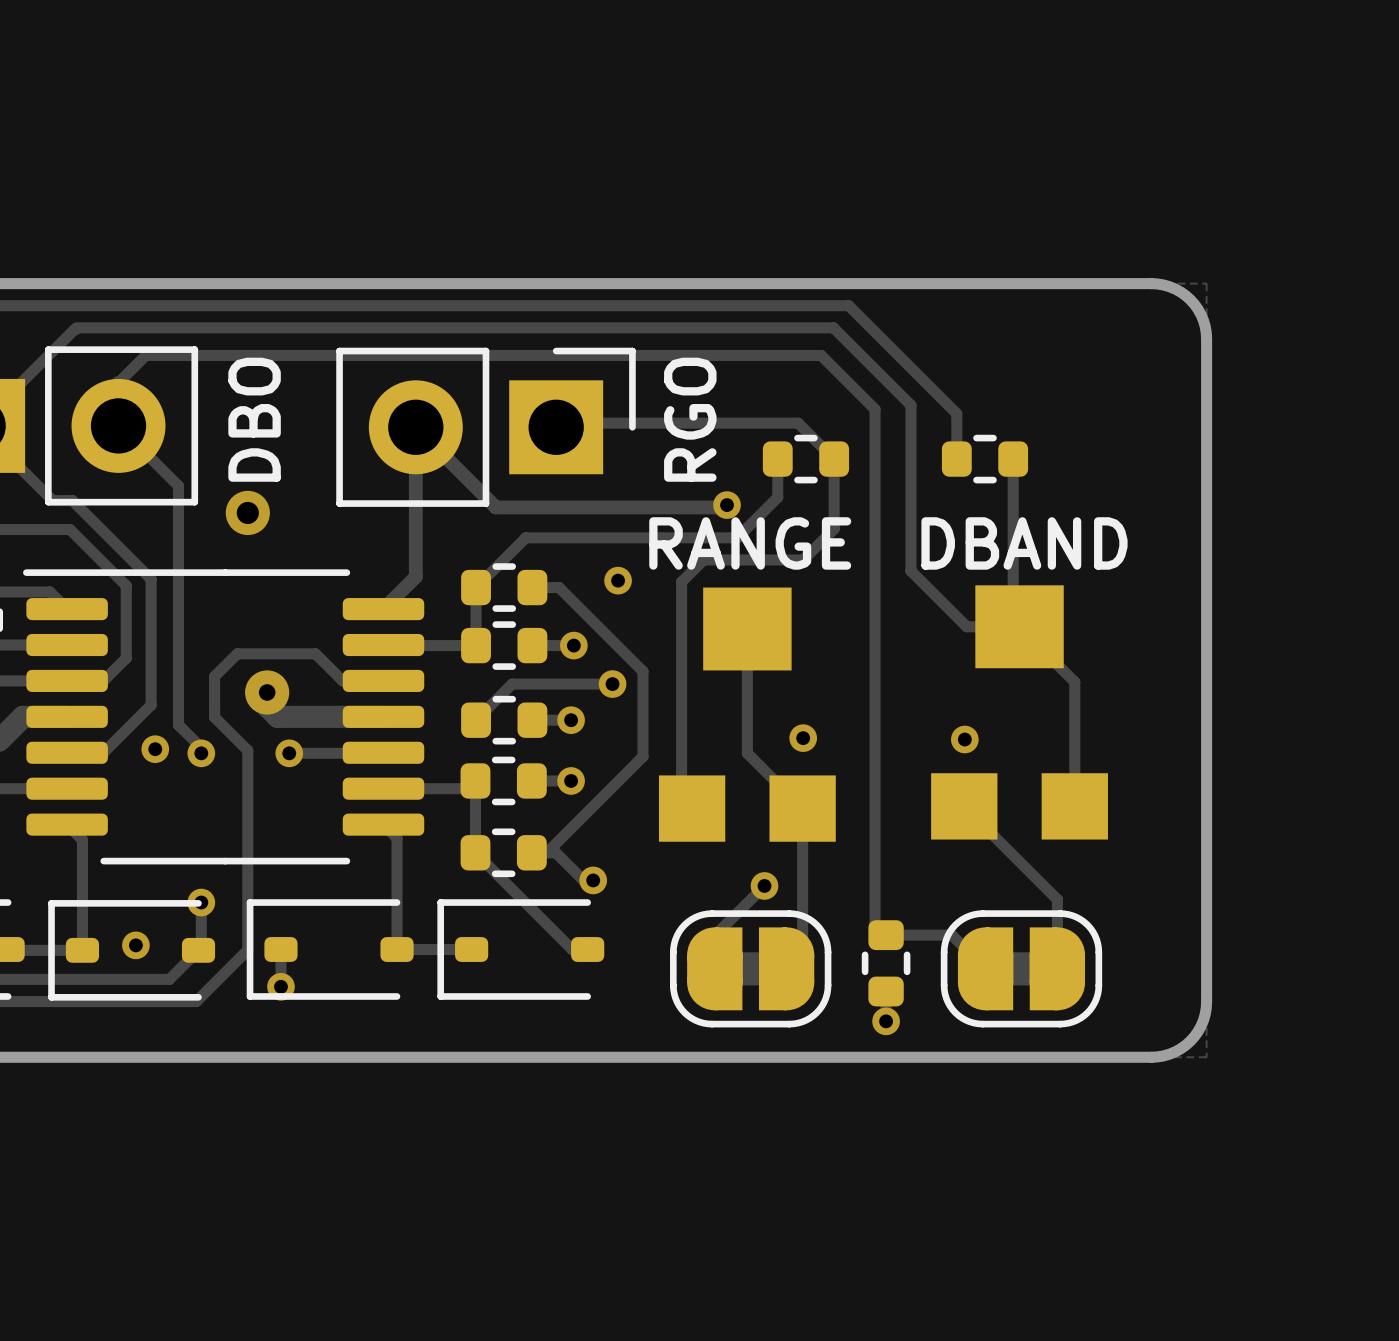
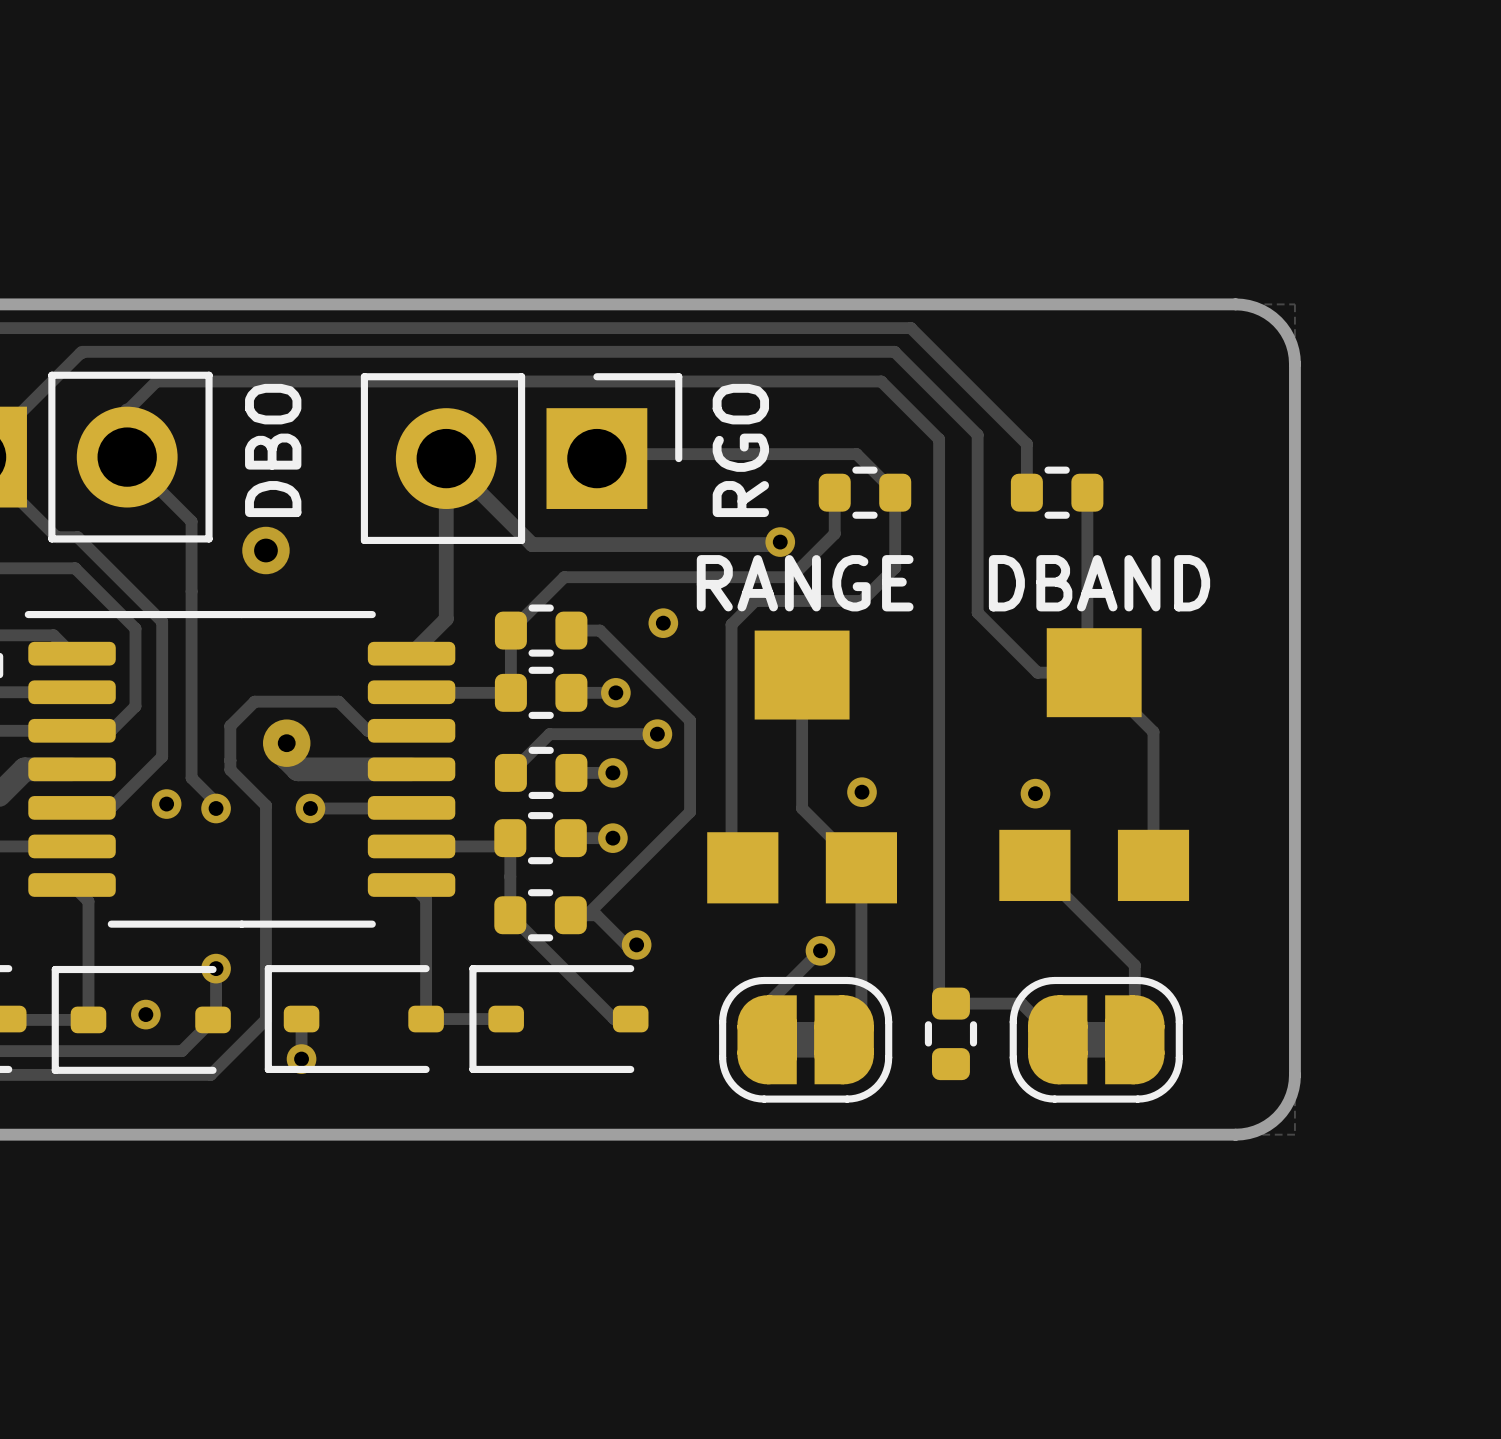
via: (886, 1021) -> none

